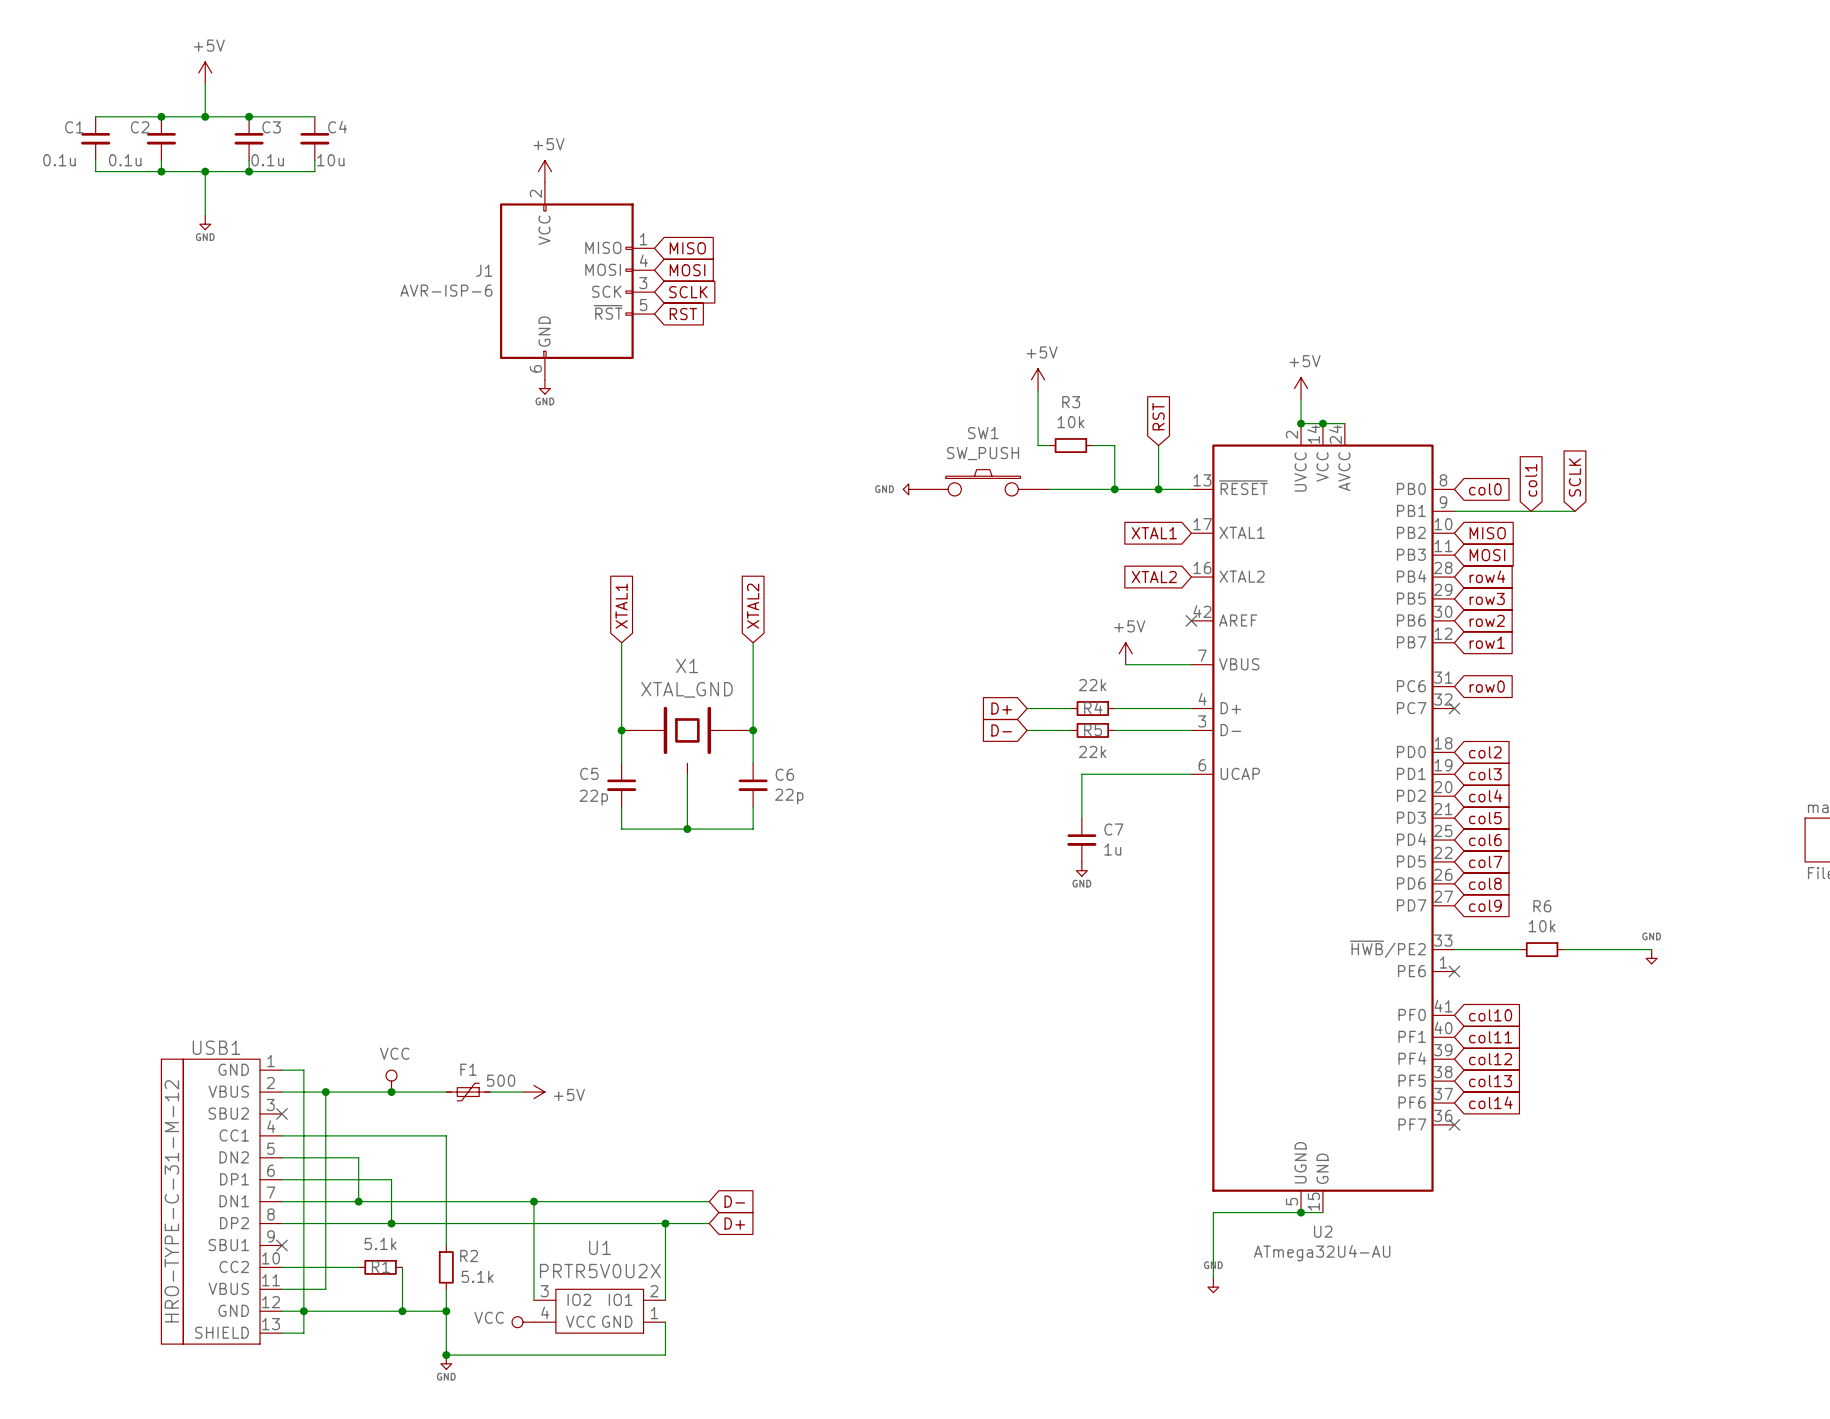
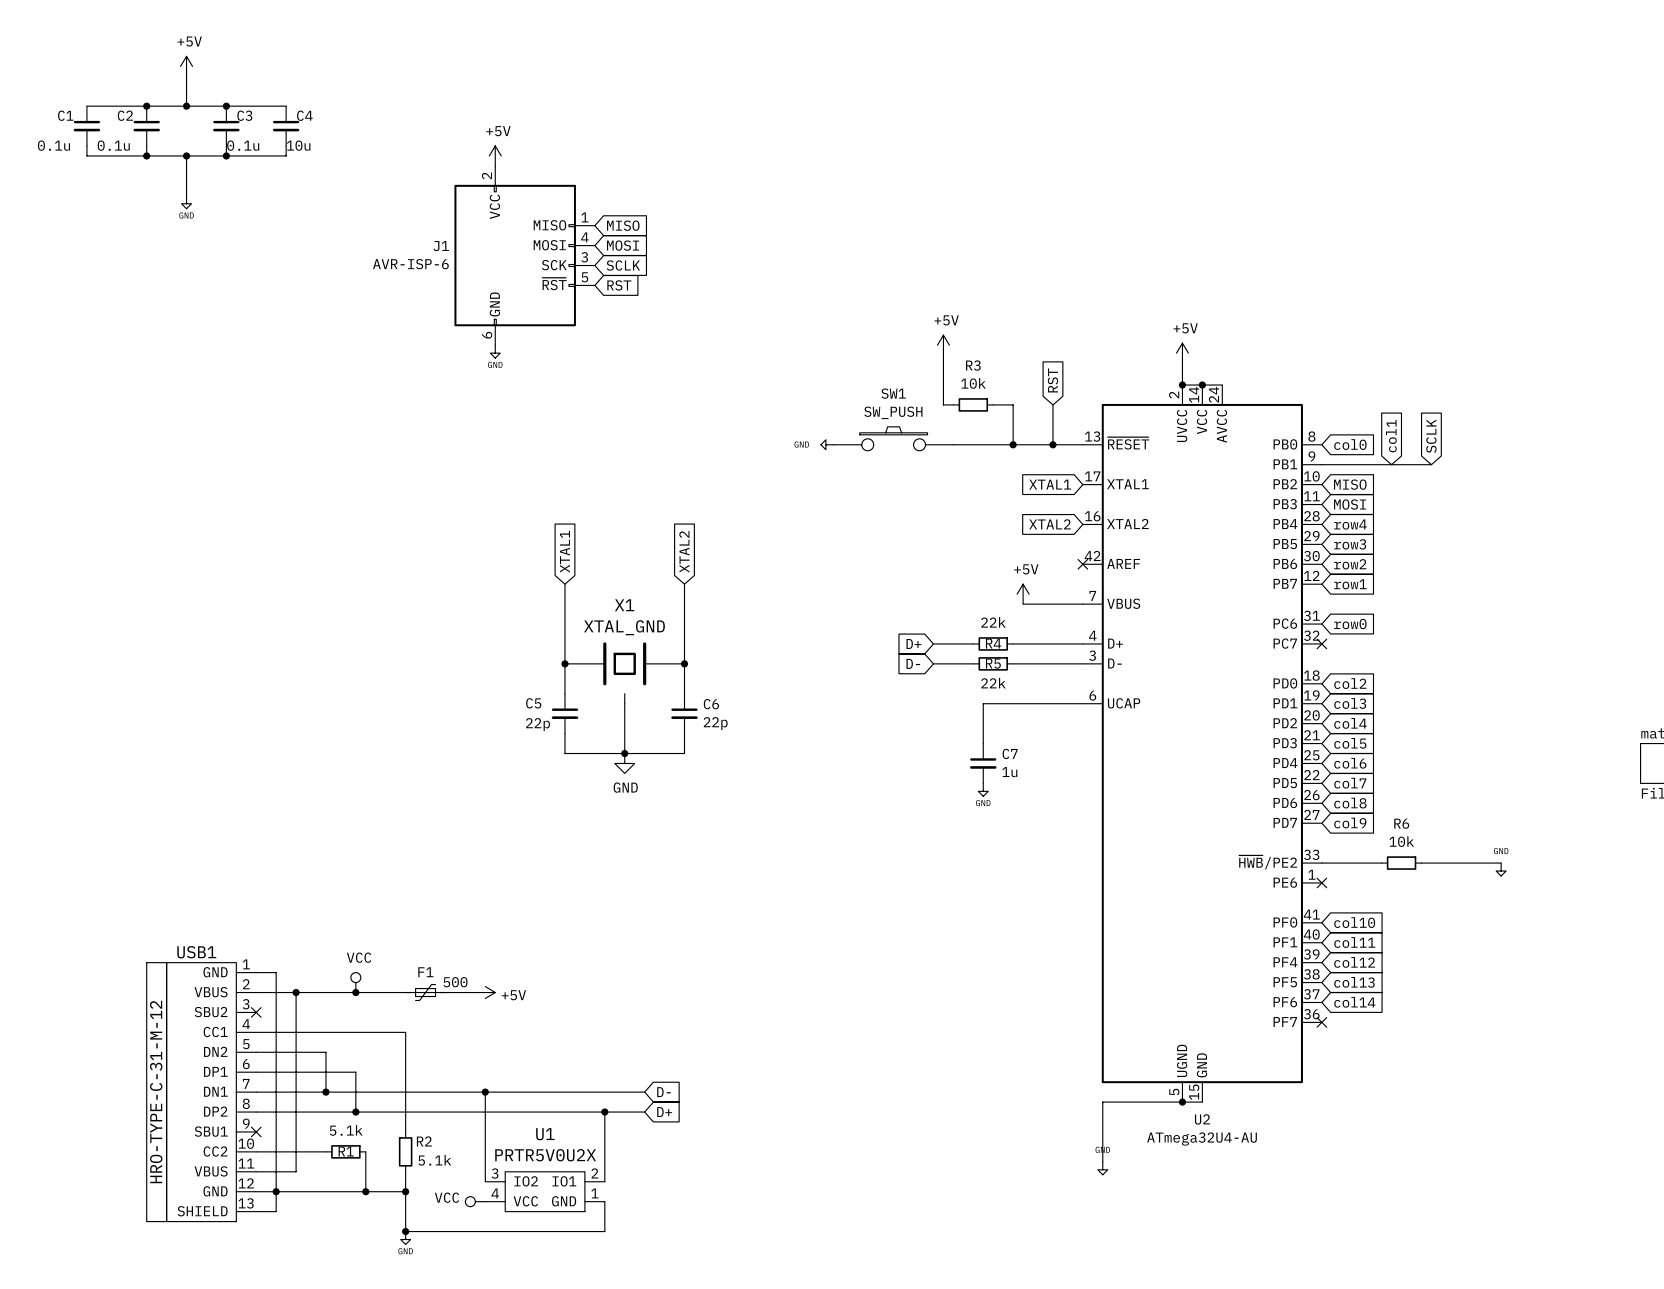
power symbol: none -> GND (624, 763)

